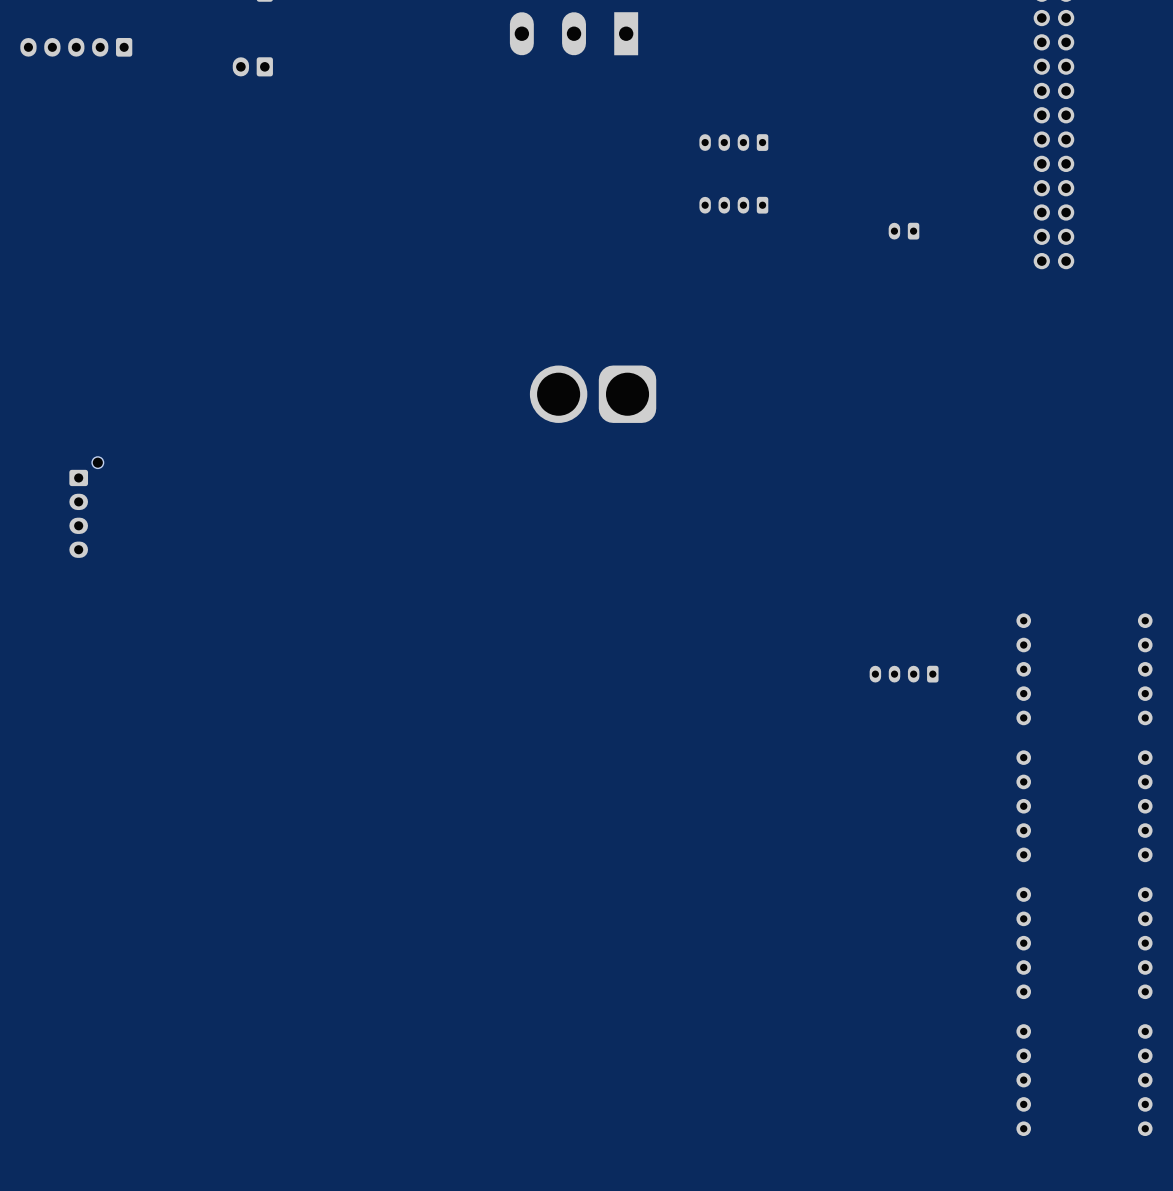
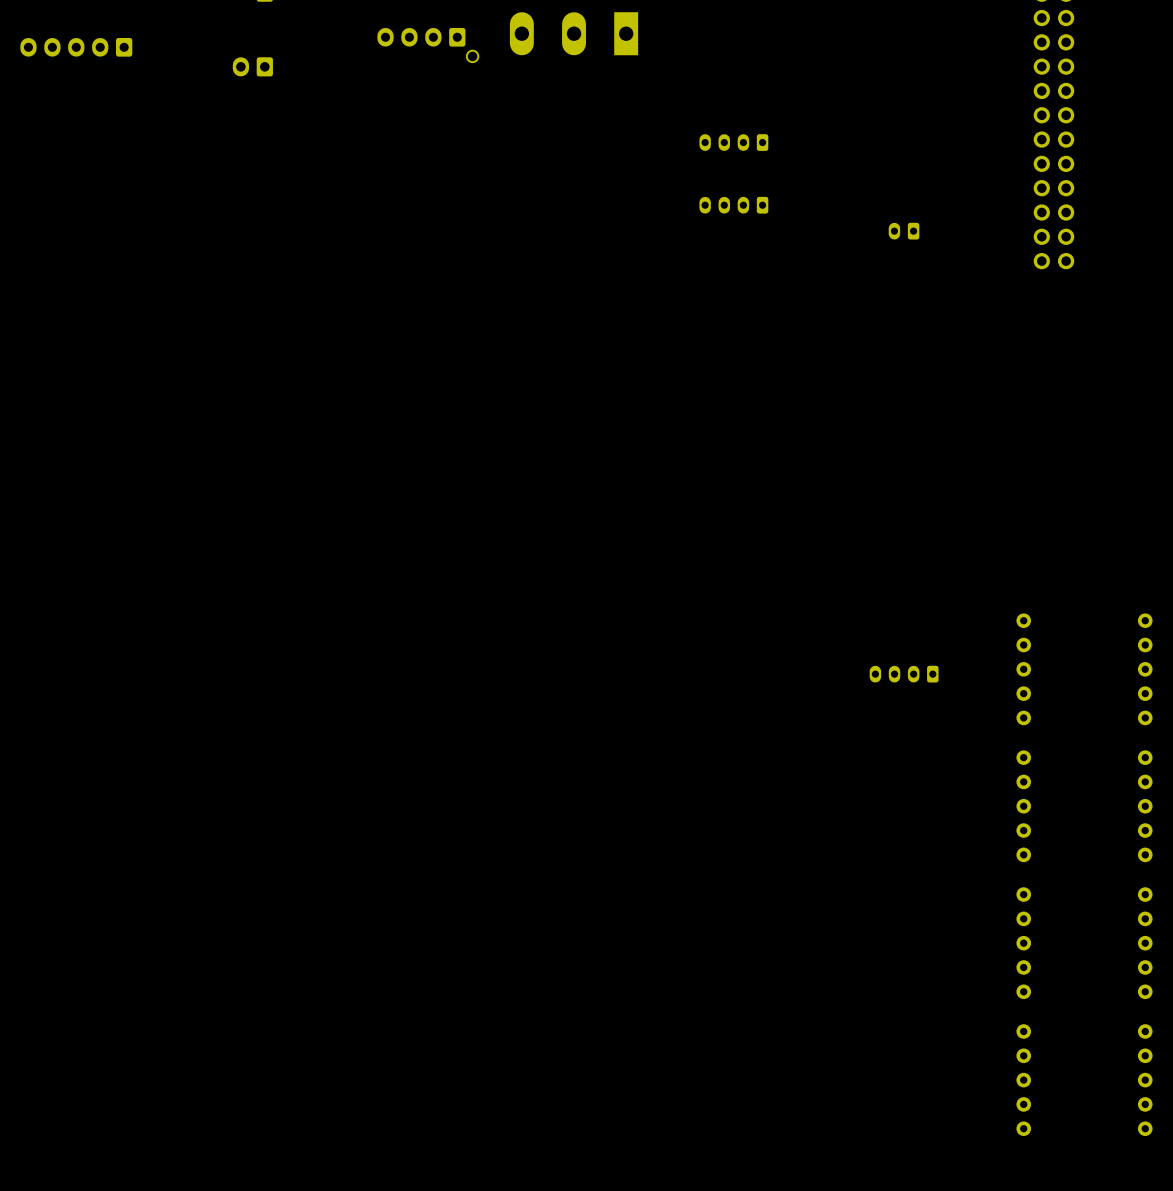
part: none -> (427, 45)
part: (593, 394) -> none
part: (86, 507) -> none

